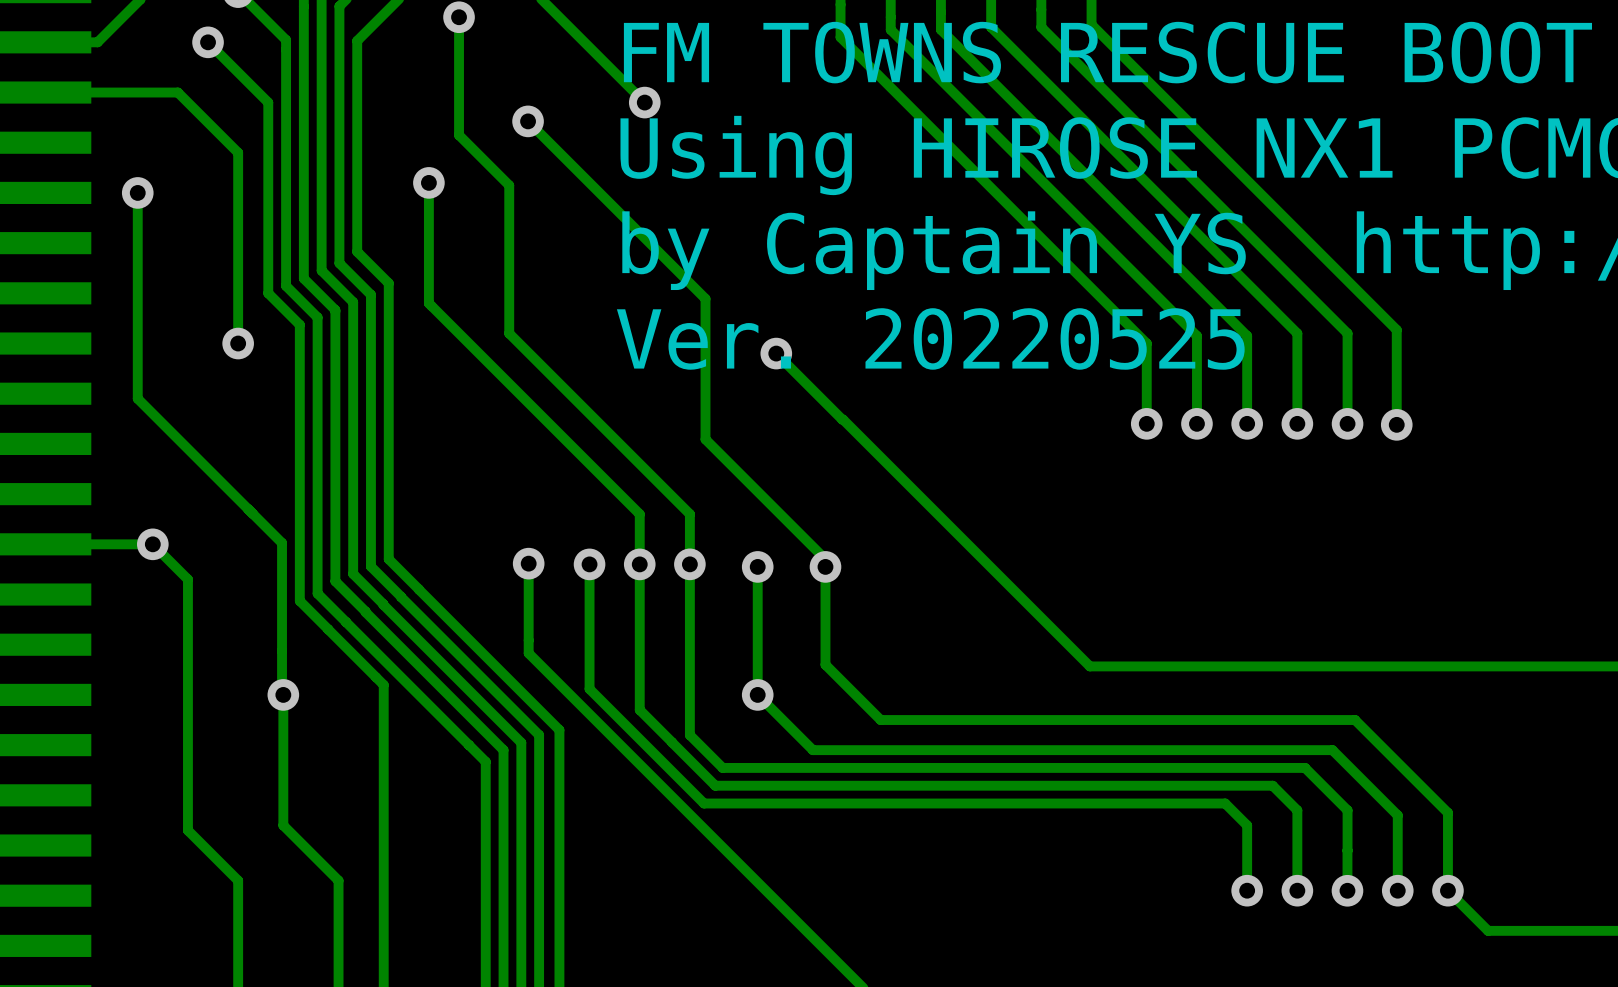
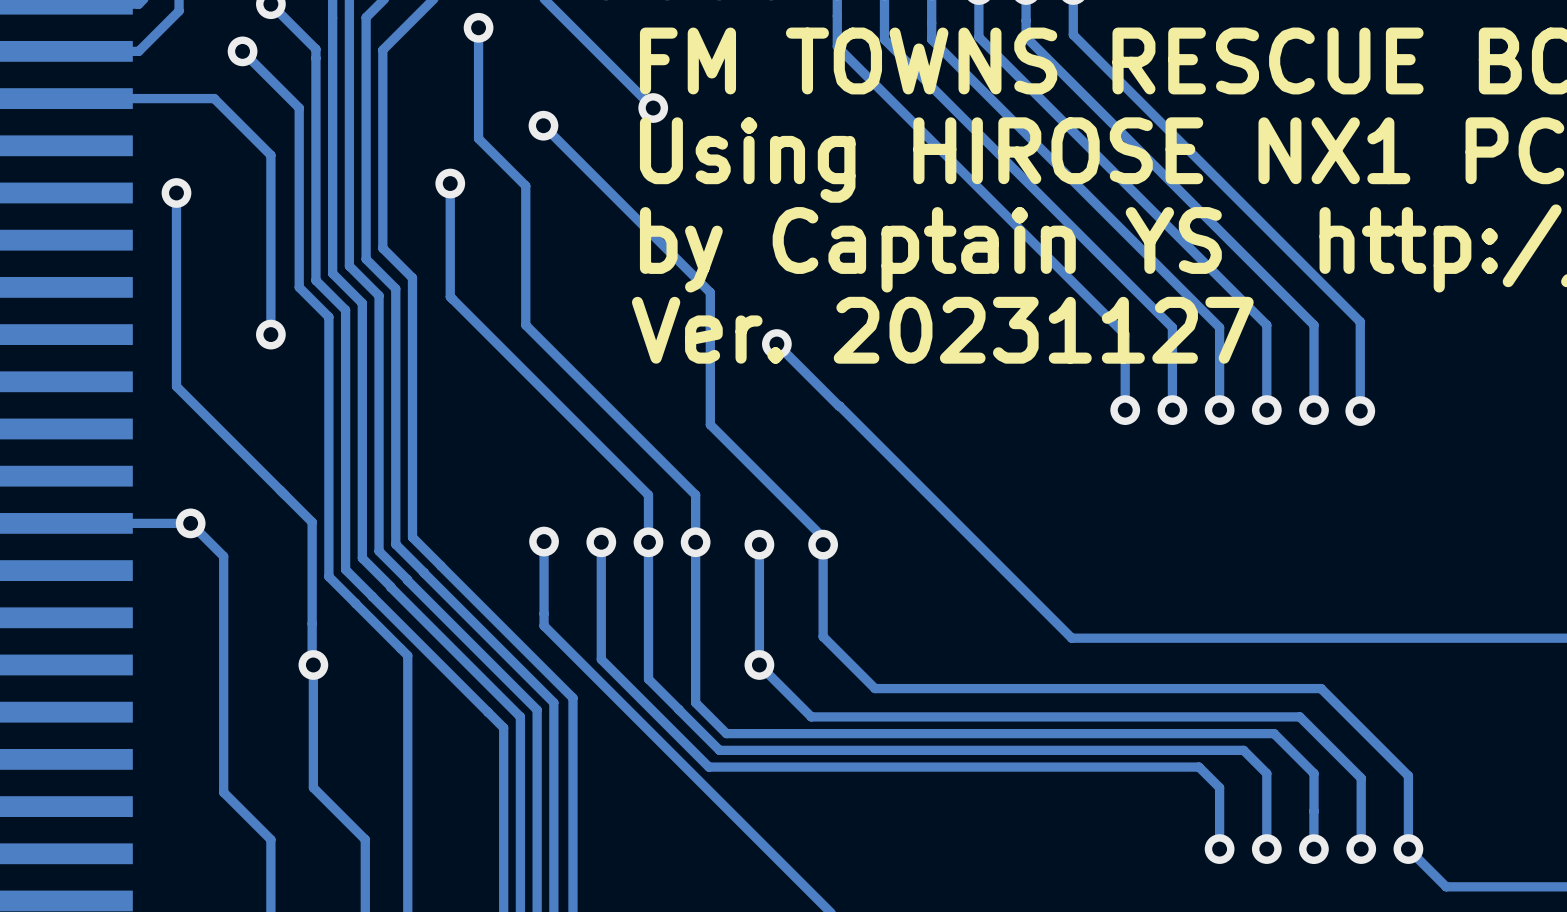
text: Ver. 20220525 (930, 338) -> Ver. 20231127 (942, 330)

